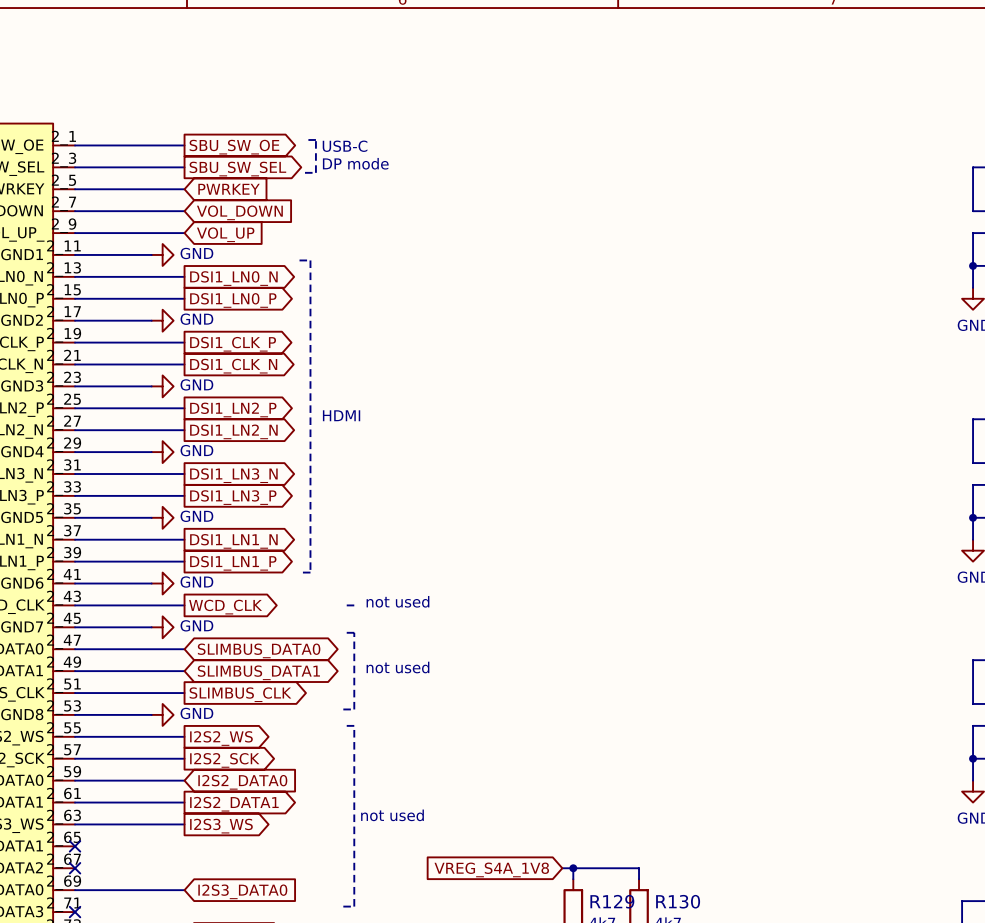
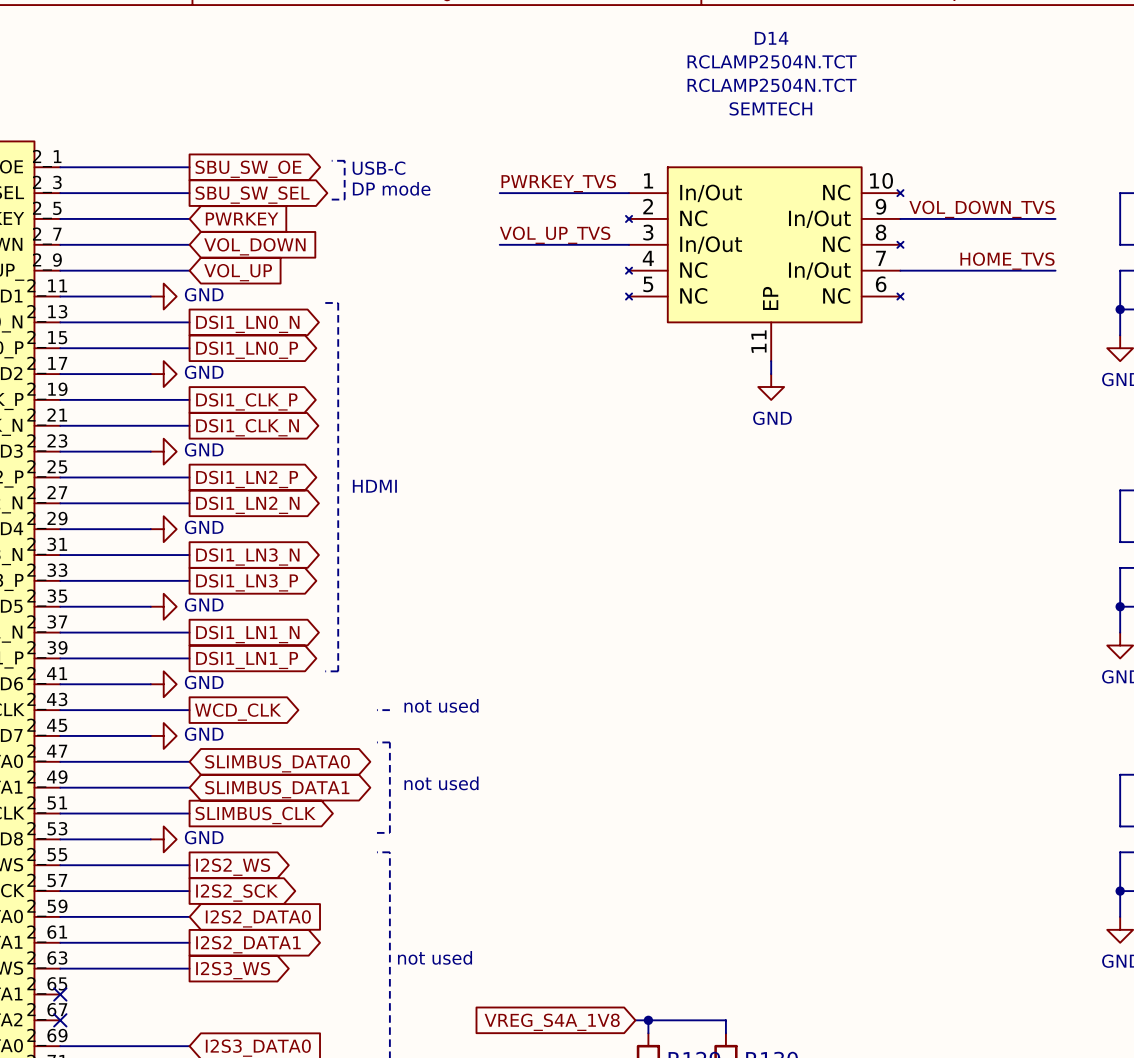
label: none -> PWRKEY_TVS (558, 183)
wire: none -> (499, 193) (629, 193)
label: none -> VOL_DOWN_TVS (981, 209)
wire: none -> (900, 218) (1055, 218)
label: none -> VOL_UP_TVS (555, 235)
wire: none -> (499, 244) (629, 244)
label: none -> HOME_TVS (1007, 261)
D14: none -> RCLAMP2504N.TCT (764, 263)
wire: none -> (900, 270) (1055, 270)
wire: none -> (771, 361) (771, 374)
power symbol: none -> GND (771, 387)

